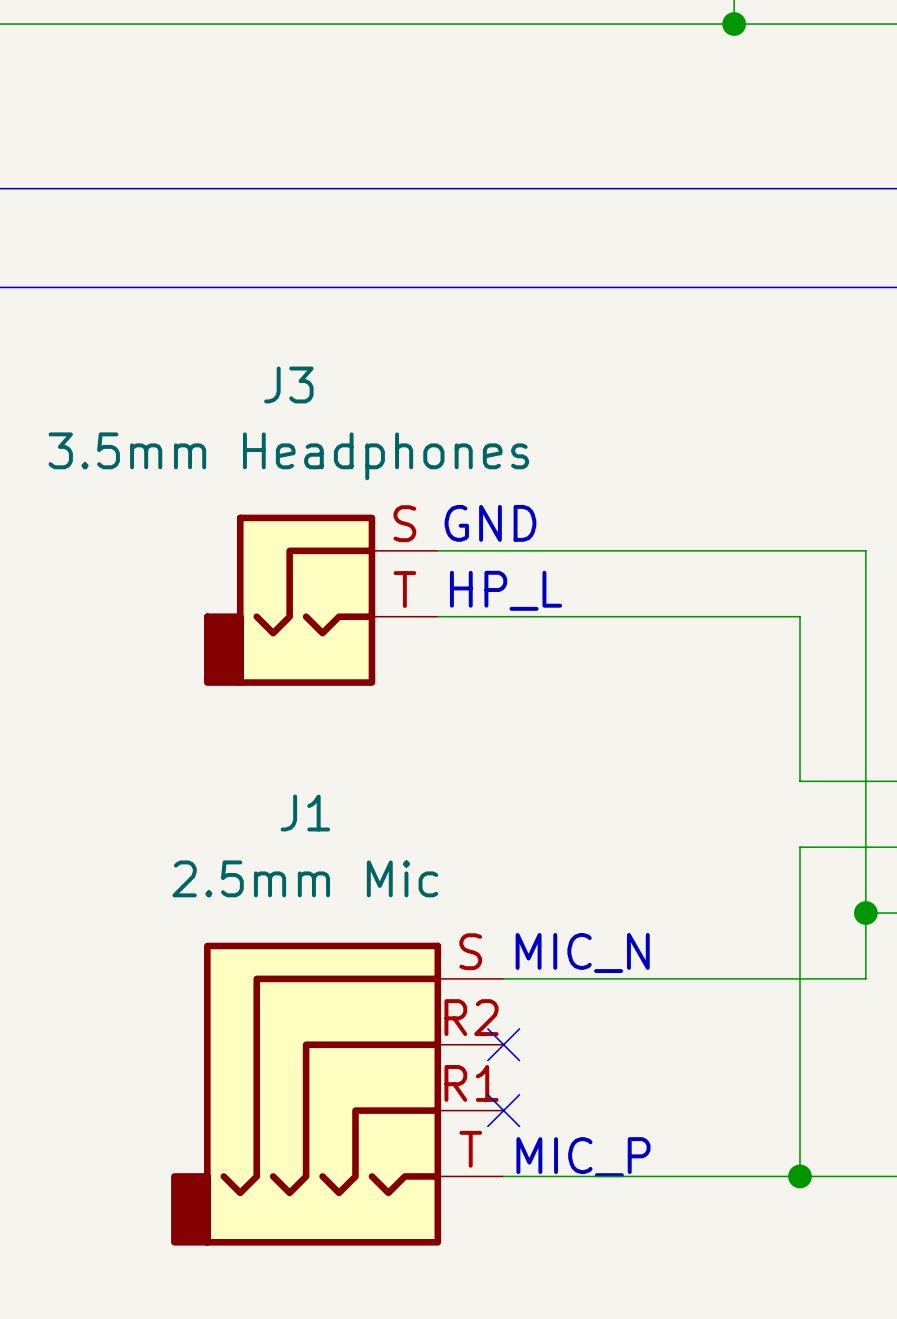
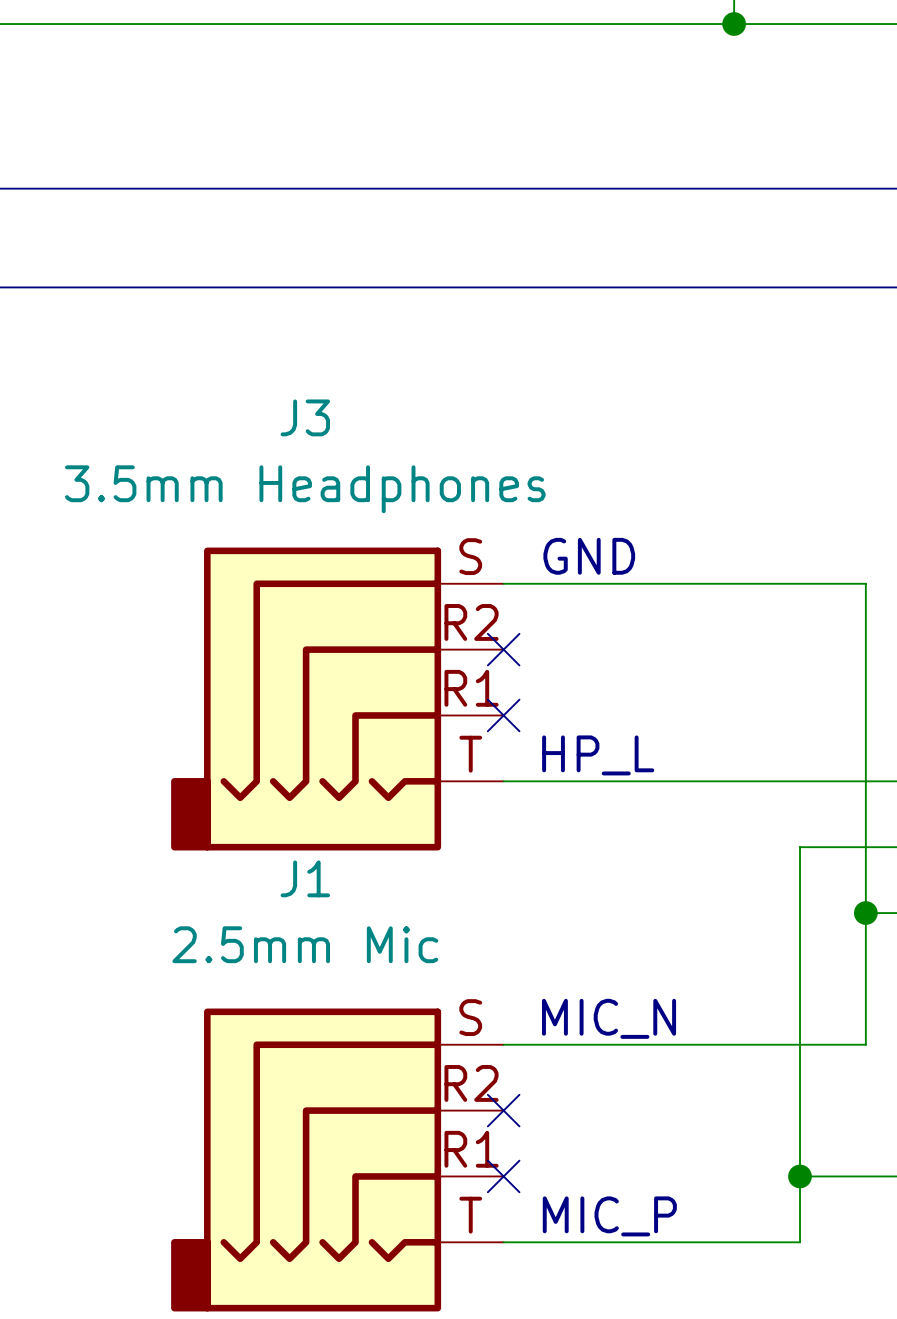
J3 name position: J3 (288, 384) -> J3 (305, 417)
J3 value position: 3.5mm Headphones (288, 456) -> 3.5mm Headphones (305, 489)
J3 symbol: [204, 514, 438, 686] -> [171, 547, 504, 851]
text position: GND (490, 523) -> GND (589, 556)
wire: (437, 550) (865, 550) (865, 583) -> (503, 583) (865, 583)
text position: HP_L (506, 590) -> HP_L (598, 755)
wire: (437, 616) (800, 616) (800, 781) -> (503, 781) (800, 781)
no-connect mark: none -> (503, 649)
no-connect mark: none -> (503, 715)
text position: MIC_N (582, 952) -> MIC_N (609, 1018)
wire: (503, 978) (865, 978) -> (503, 1044) (865, 1044) (865, 978)
no-connect mark position: (503, 1044) -> (503, 1176)
J1 position: (337, 1094) -> (337, 1159)
text position: MIC_P (583, 1157) -> MIC_P (609, 1216)
wire: (503, 1176) (800, 1176) -> (503, 1242) (800, 1242) (800, 1176)

